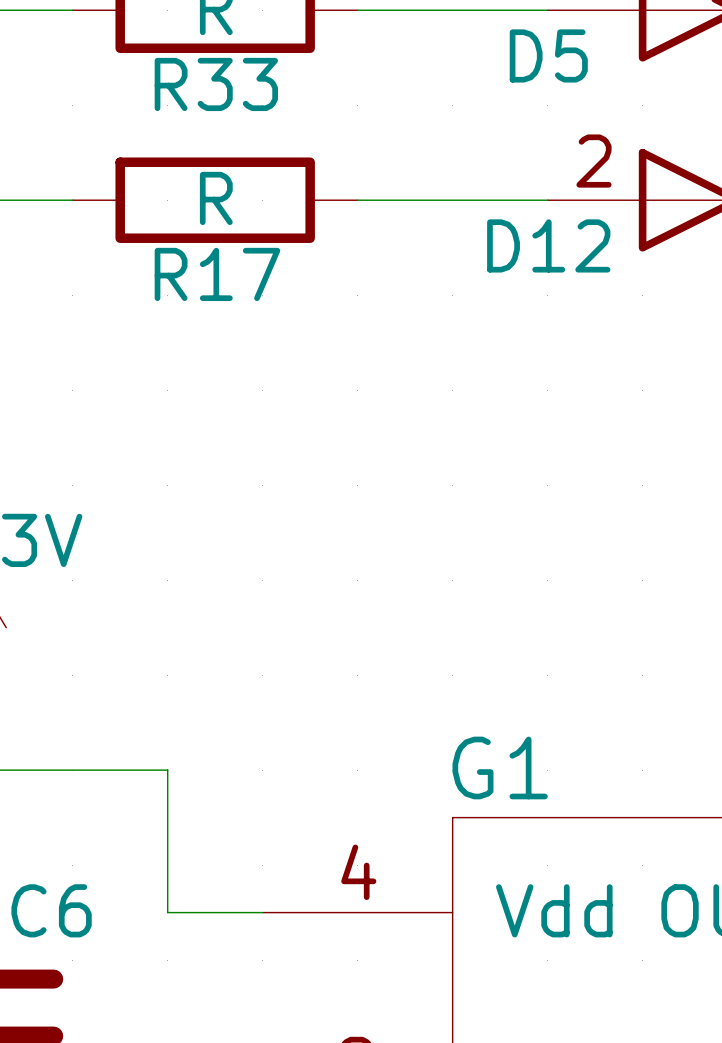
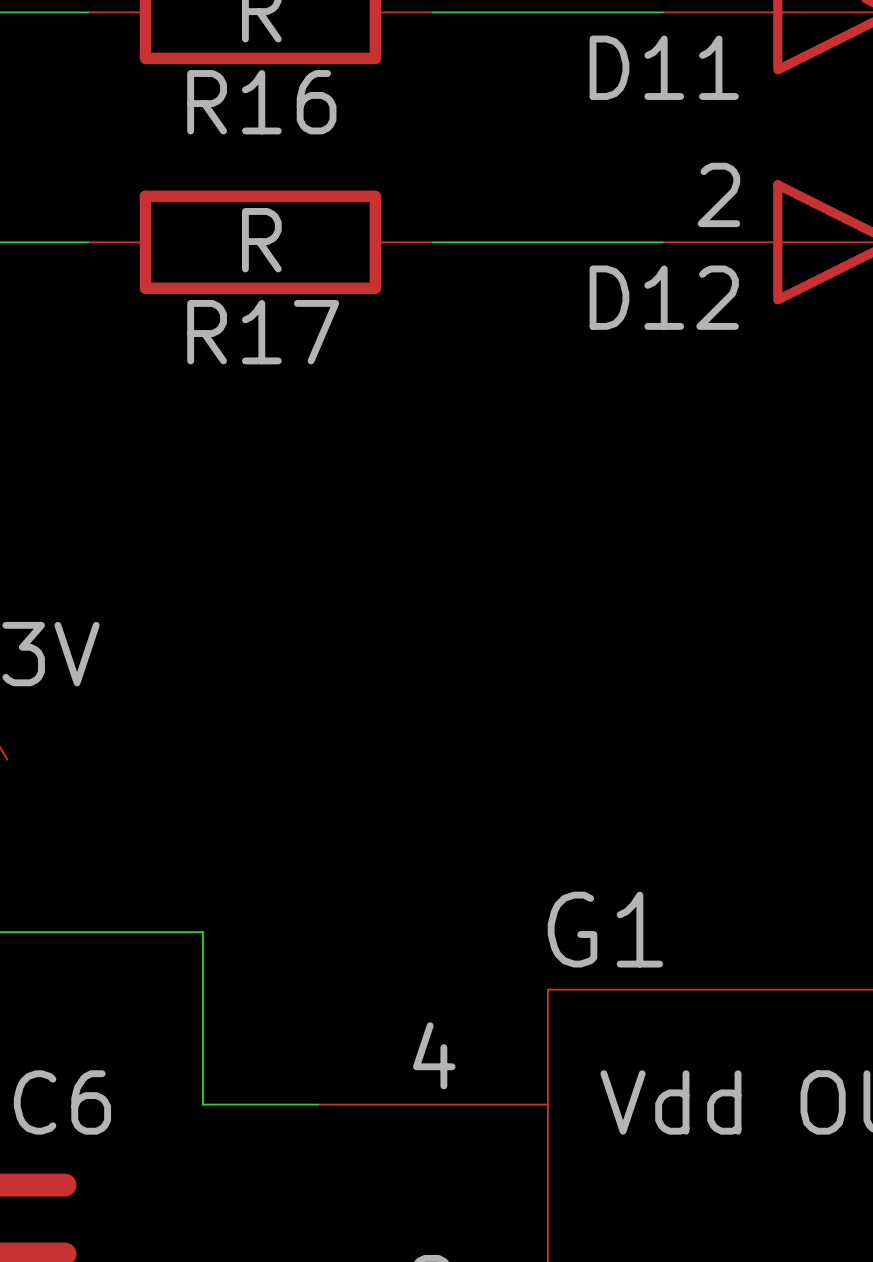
D5 name: D5 (548, 55) -> D11 (664, 67)
R33 name: R33 (216, 84) -> R16 (261, 102)

